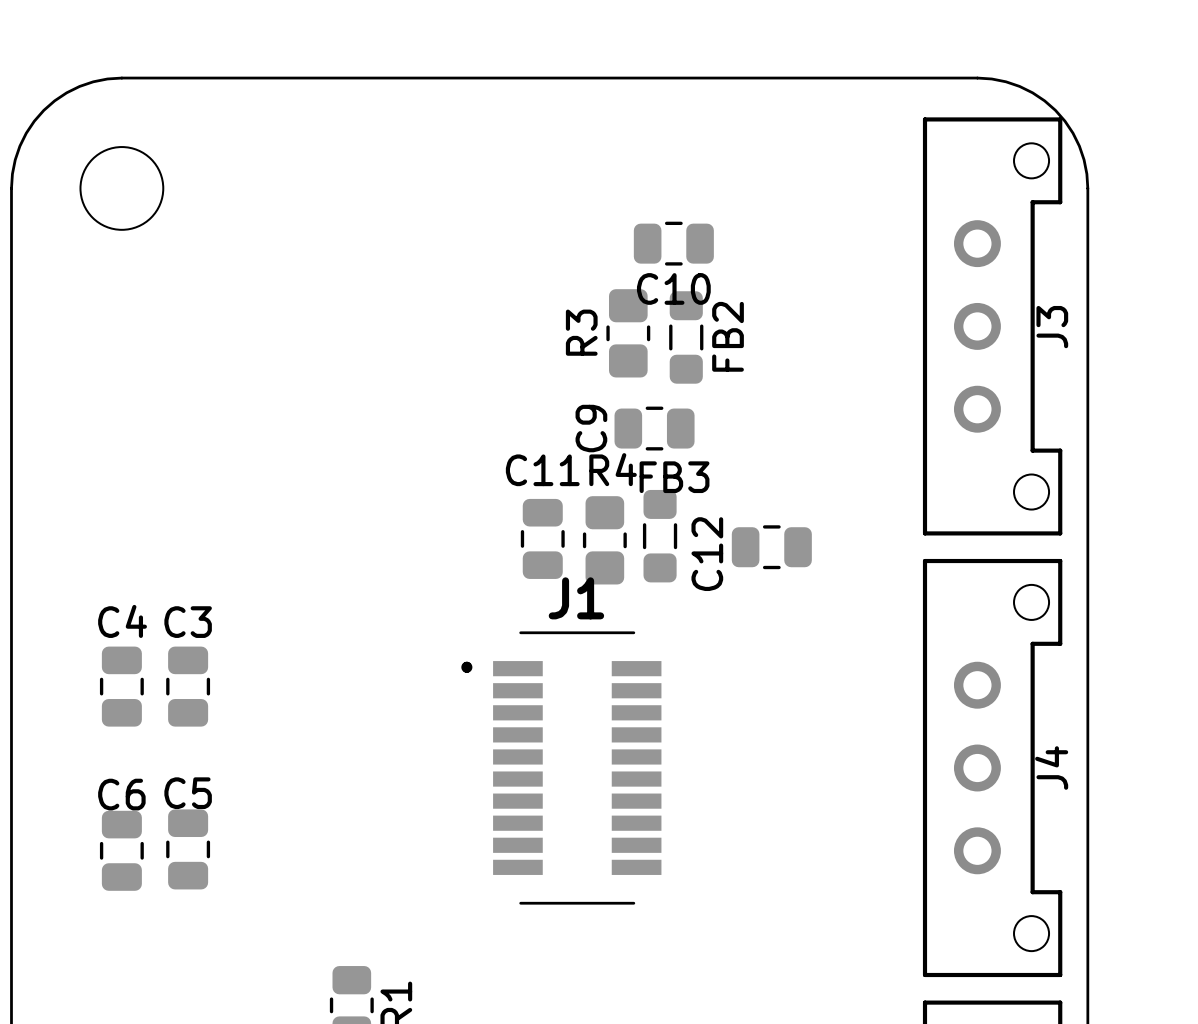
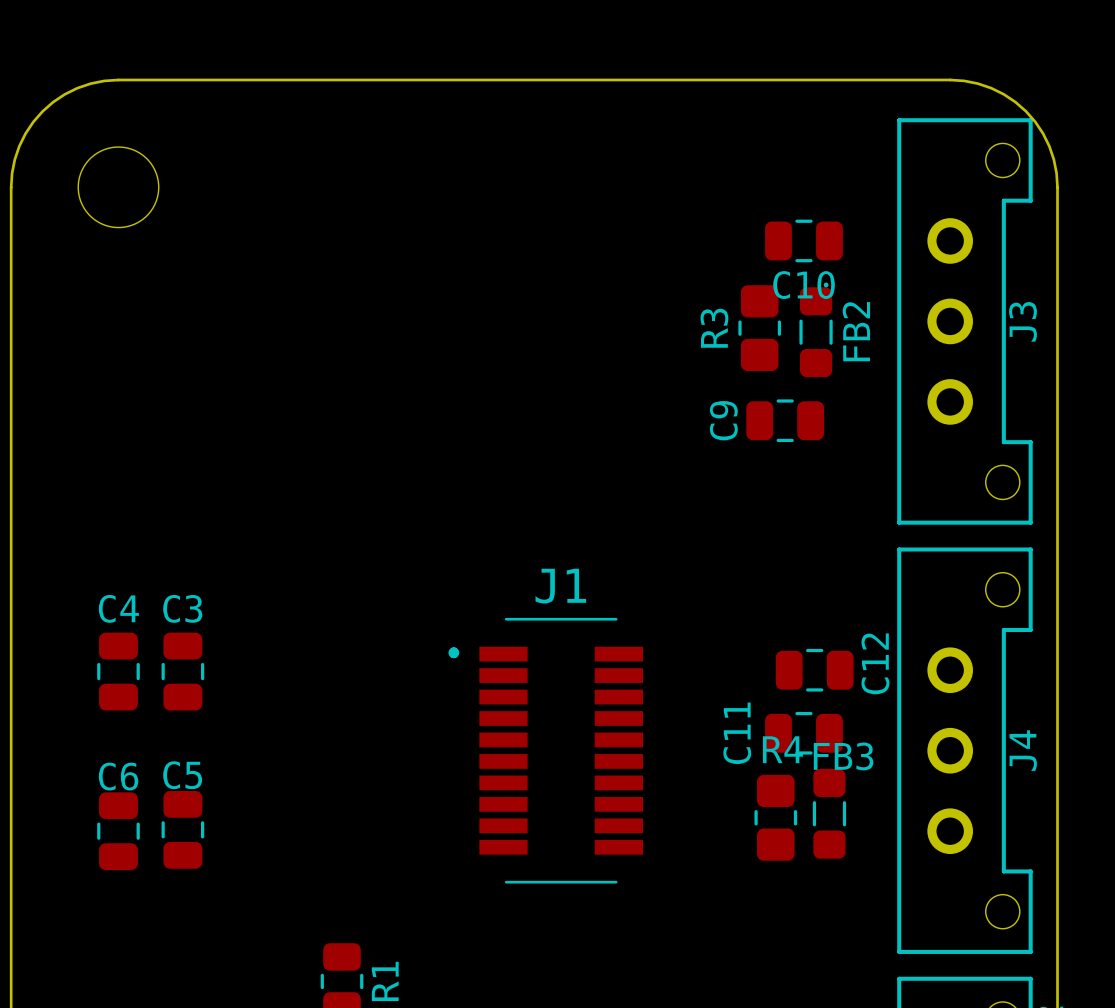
C10 position: (673, 243) -> (803, 240)
R3 position: (628, 333) -> (759, 328)
FB2 position: (686, 337) -> (816, 332)
C9 position: (654, 428) -> (785, 420)
C11 name position: C11 (542, 470) -> C11 (737, 733)
FB3 position: (660, 536) -> (829, 813)
C11 rotation: 0° (542, 538) -> 90° clockwise (803, 733)
C11 position: (542, 538) -> (803, 733)
R4 position: (604, 540) -> (775, 817)
C12 position: (771, 547) -> (814, 670)
C12 name position: C12 (707, 554) -> C12 (875, 663)

